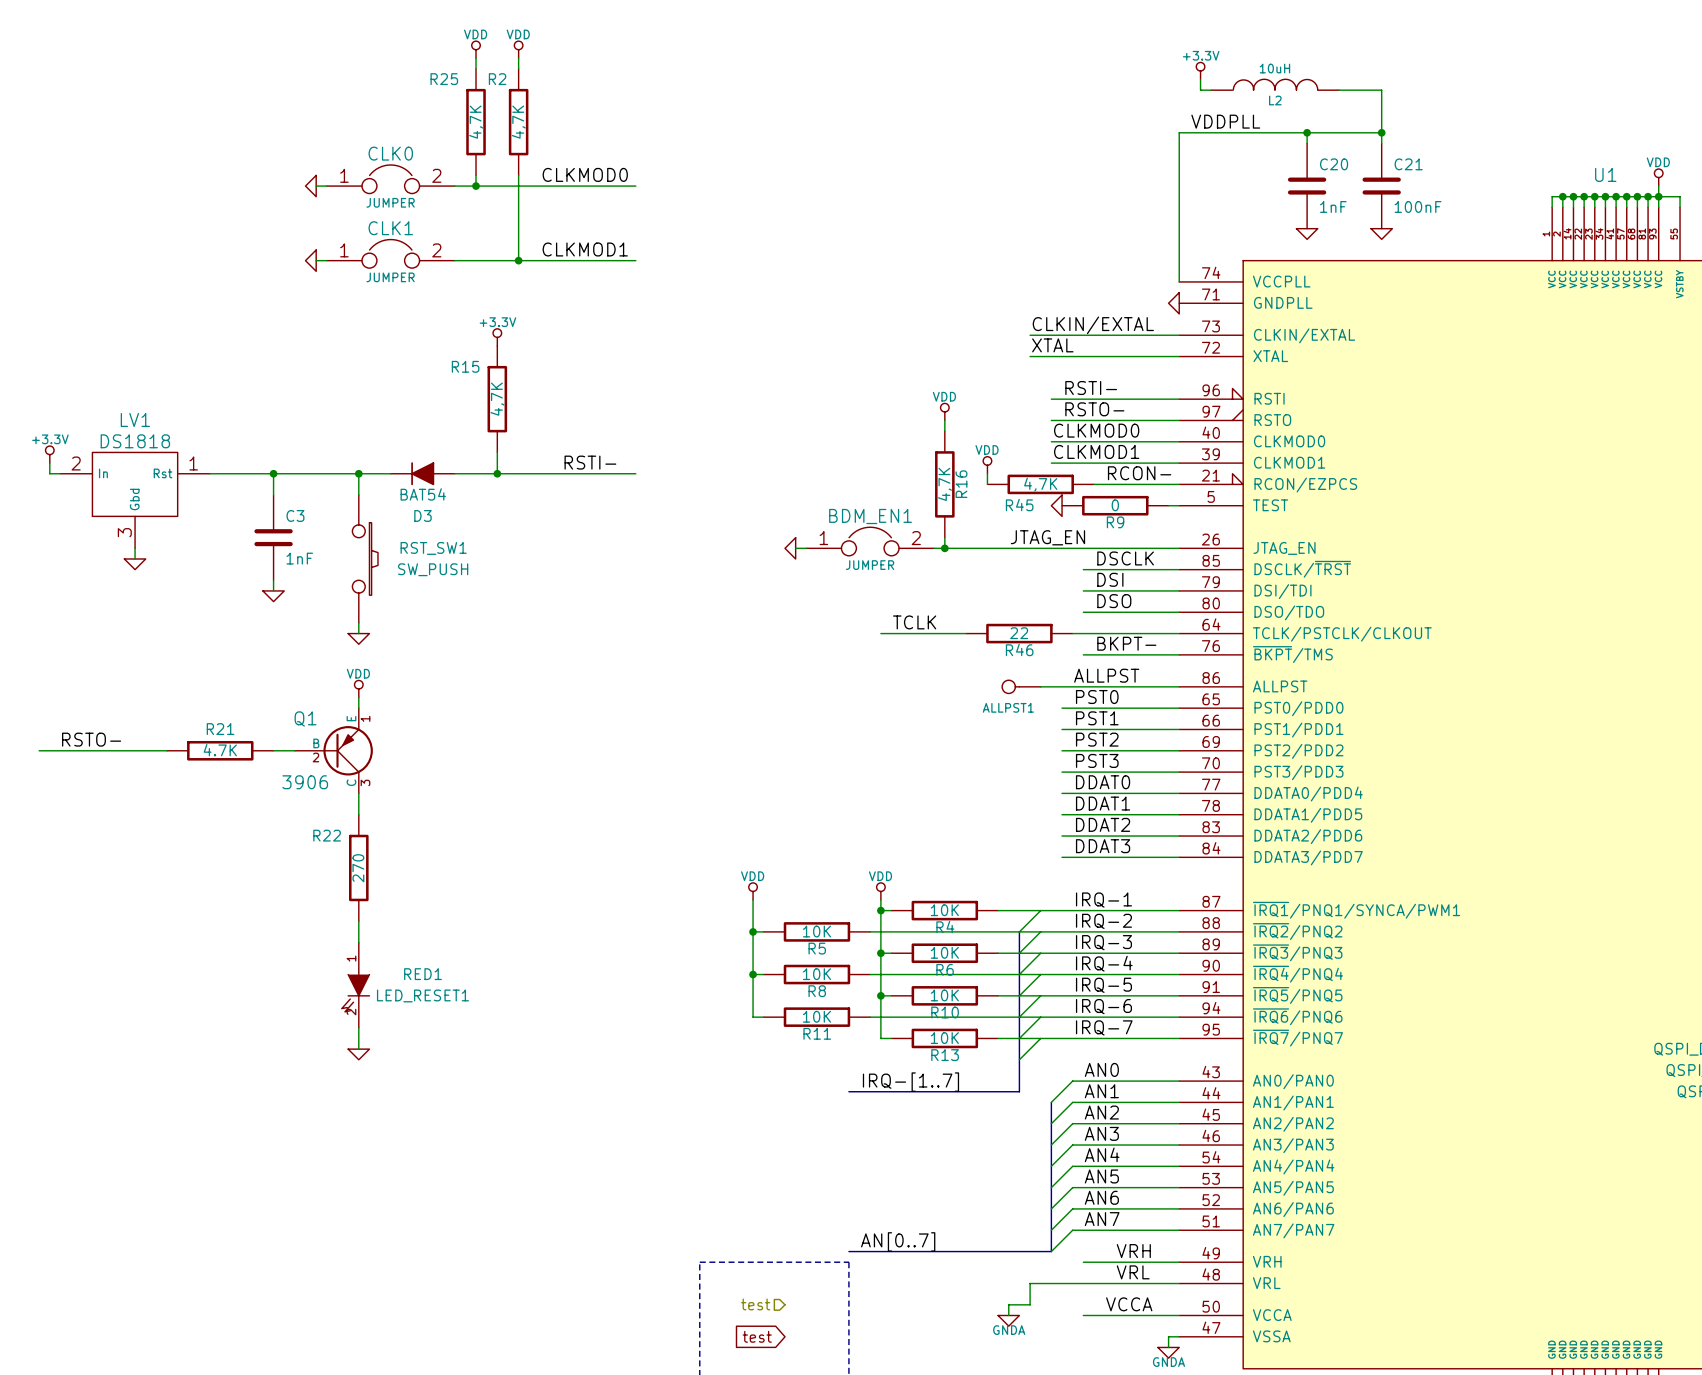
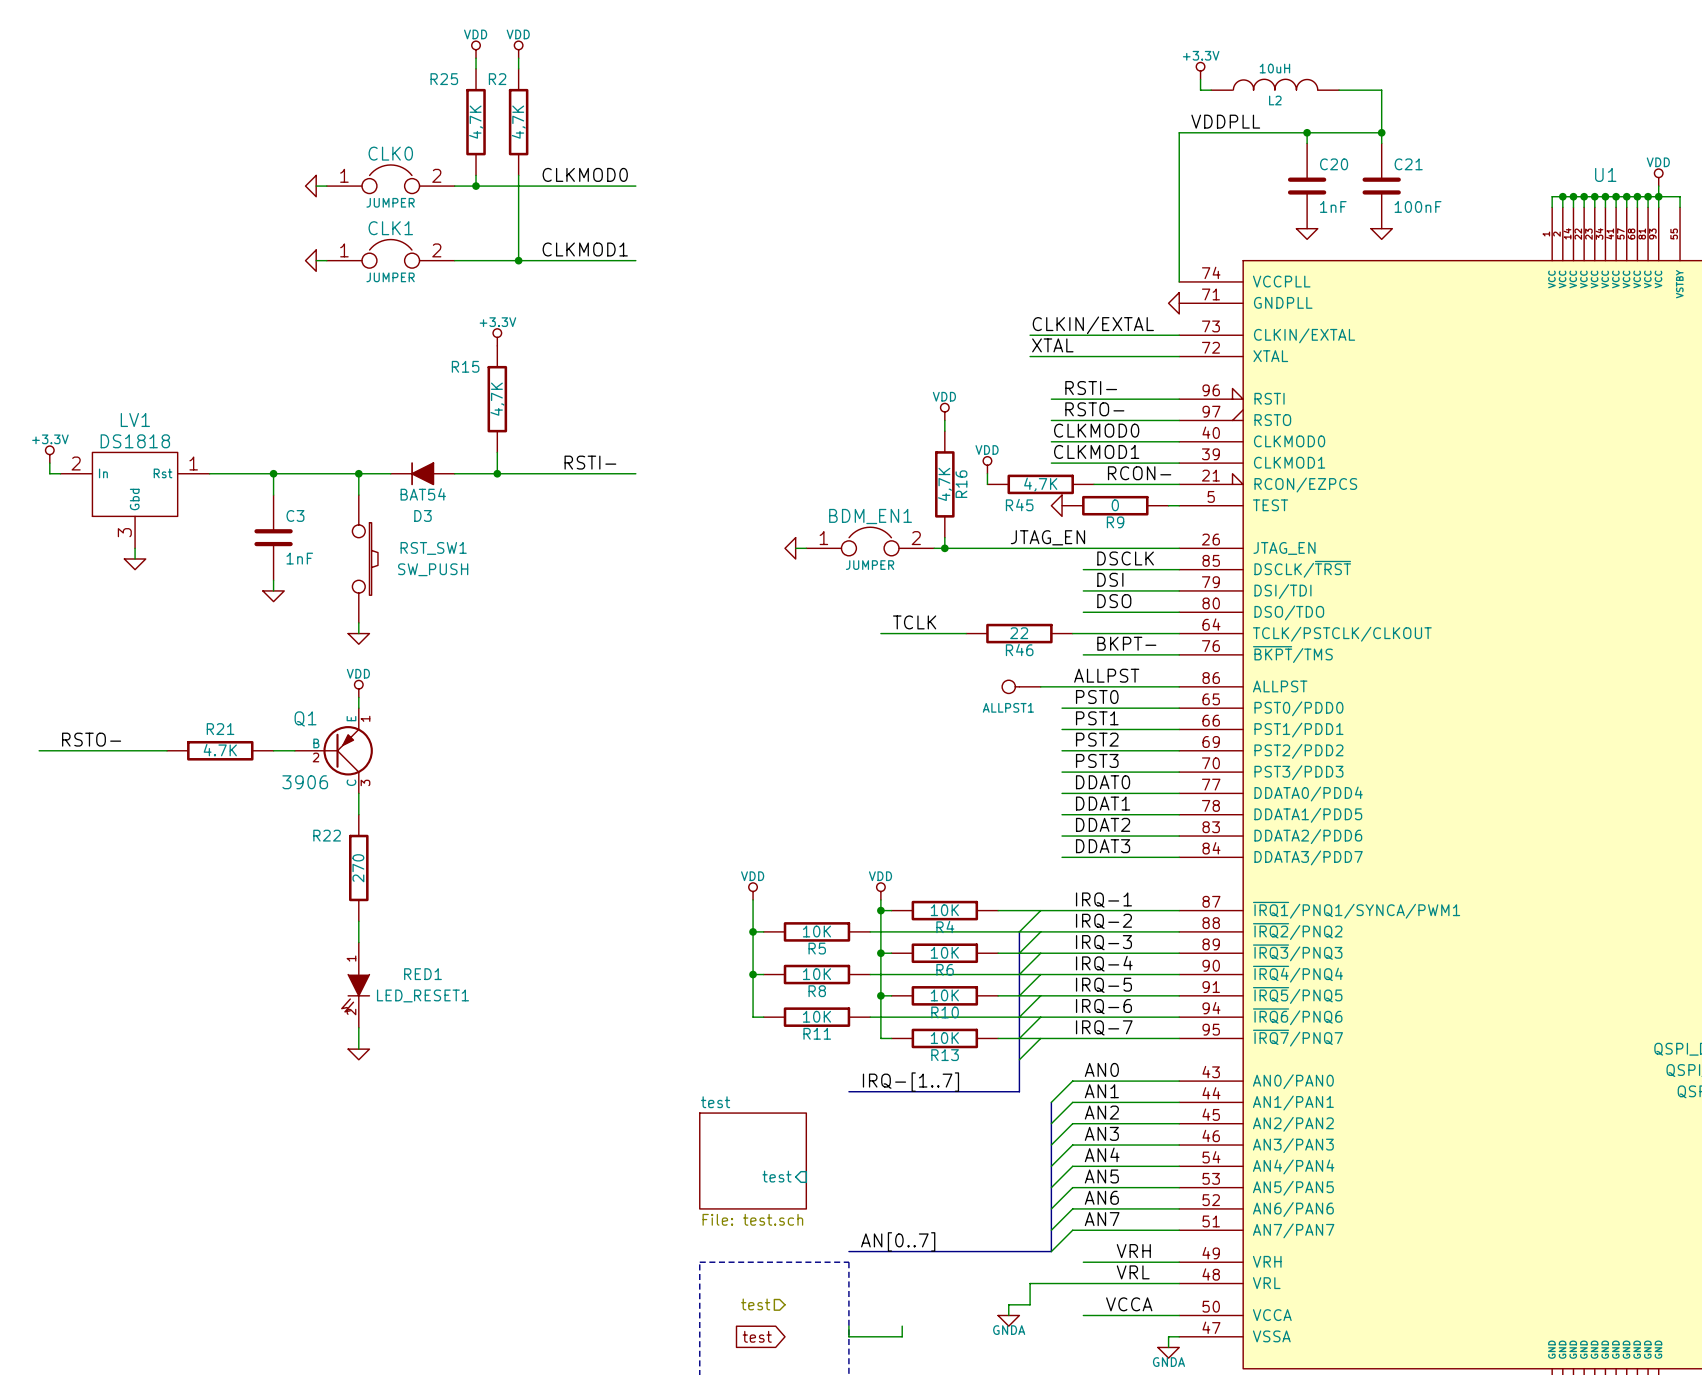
sheet test: none -> File: test.sch (753, 1161)
sheet pin: none -> test (776, 1176)
wire: none -> (848, 1326) (848, 1336) (902, 1336) (902, 1326)

